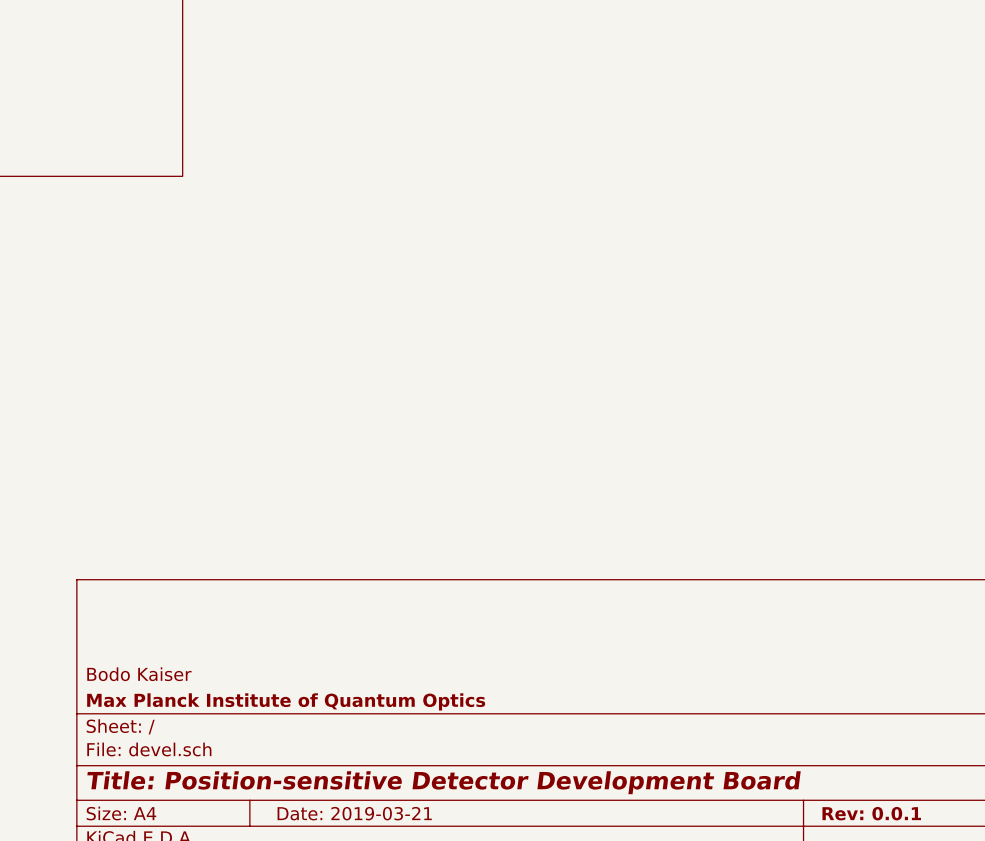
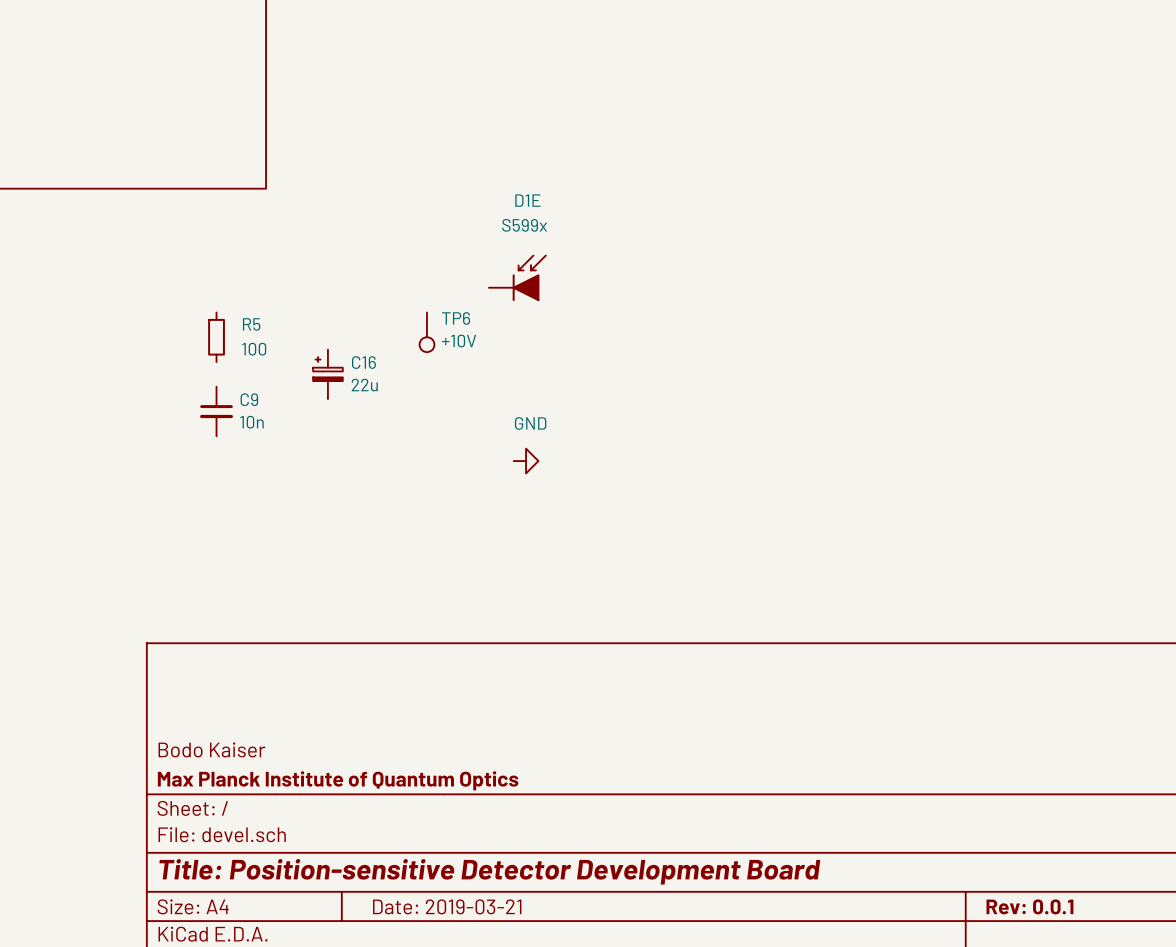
D1E: none -> S599x (517, 278)
TP6: none -> +10V (426, 332)
R5: none -> 100 (216, 337)
C16: none -> 22u (327, 374)
C9: none -> 10n (216, 411)
power symbol: none -> GND (526, 461)

